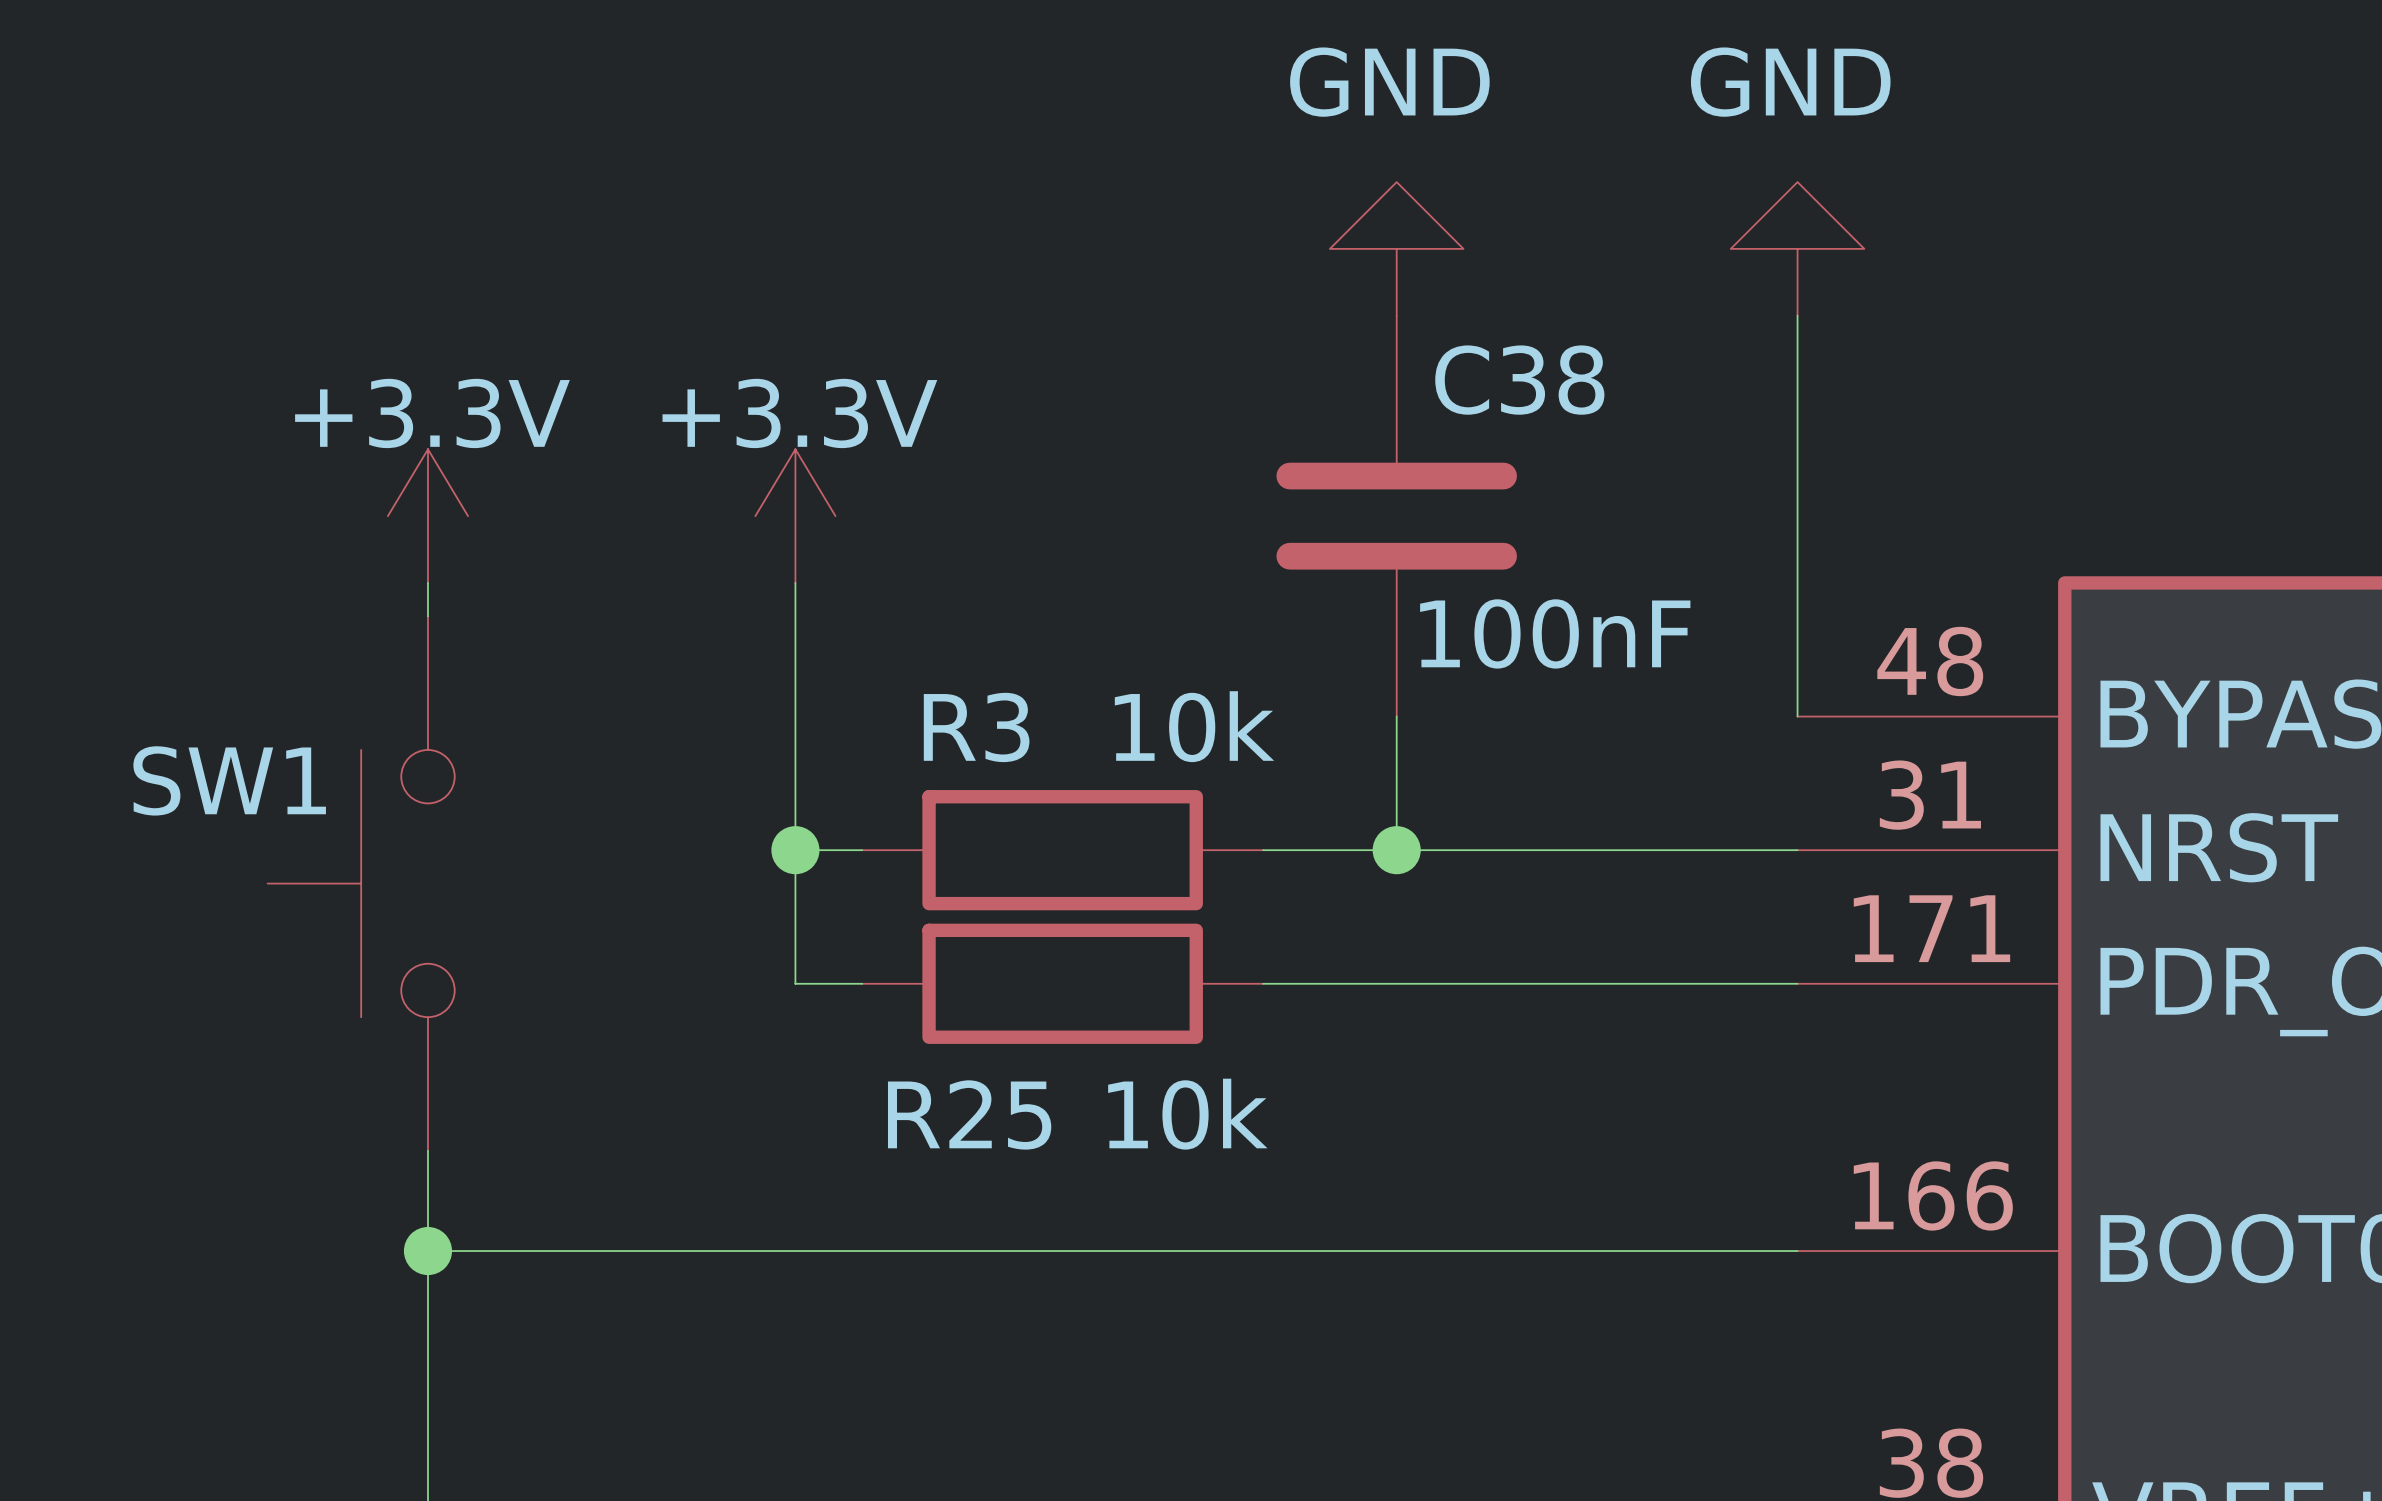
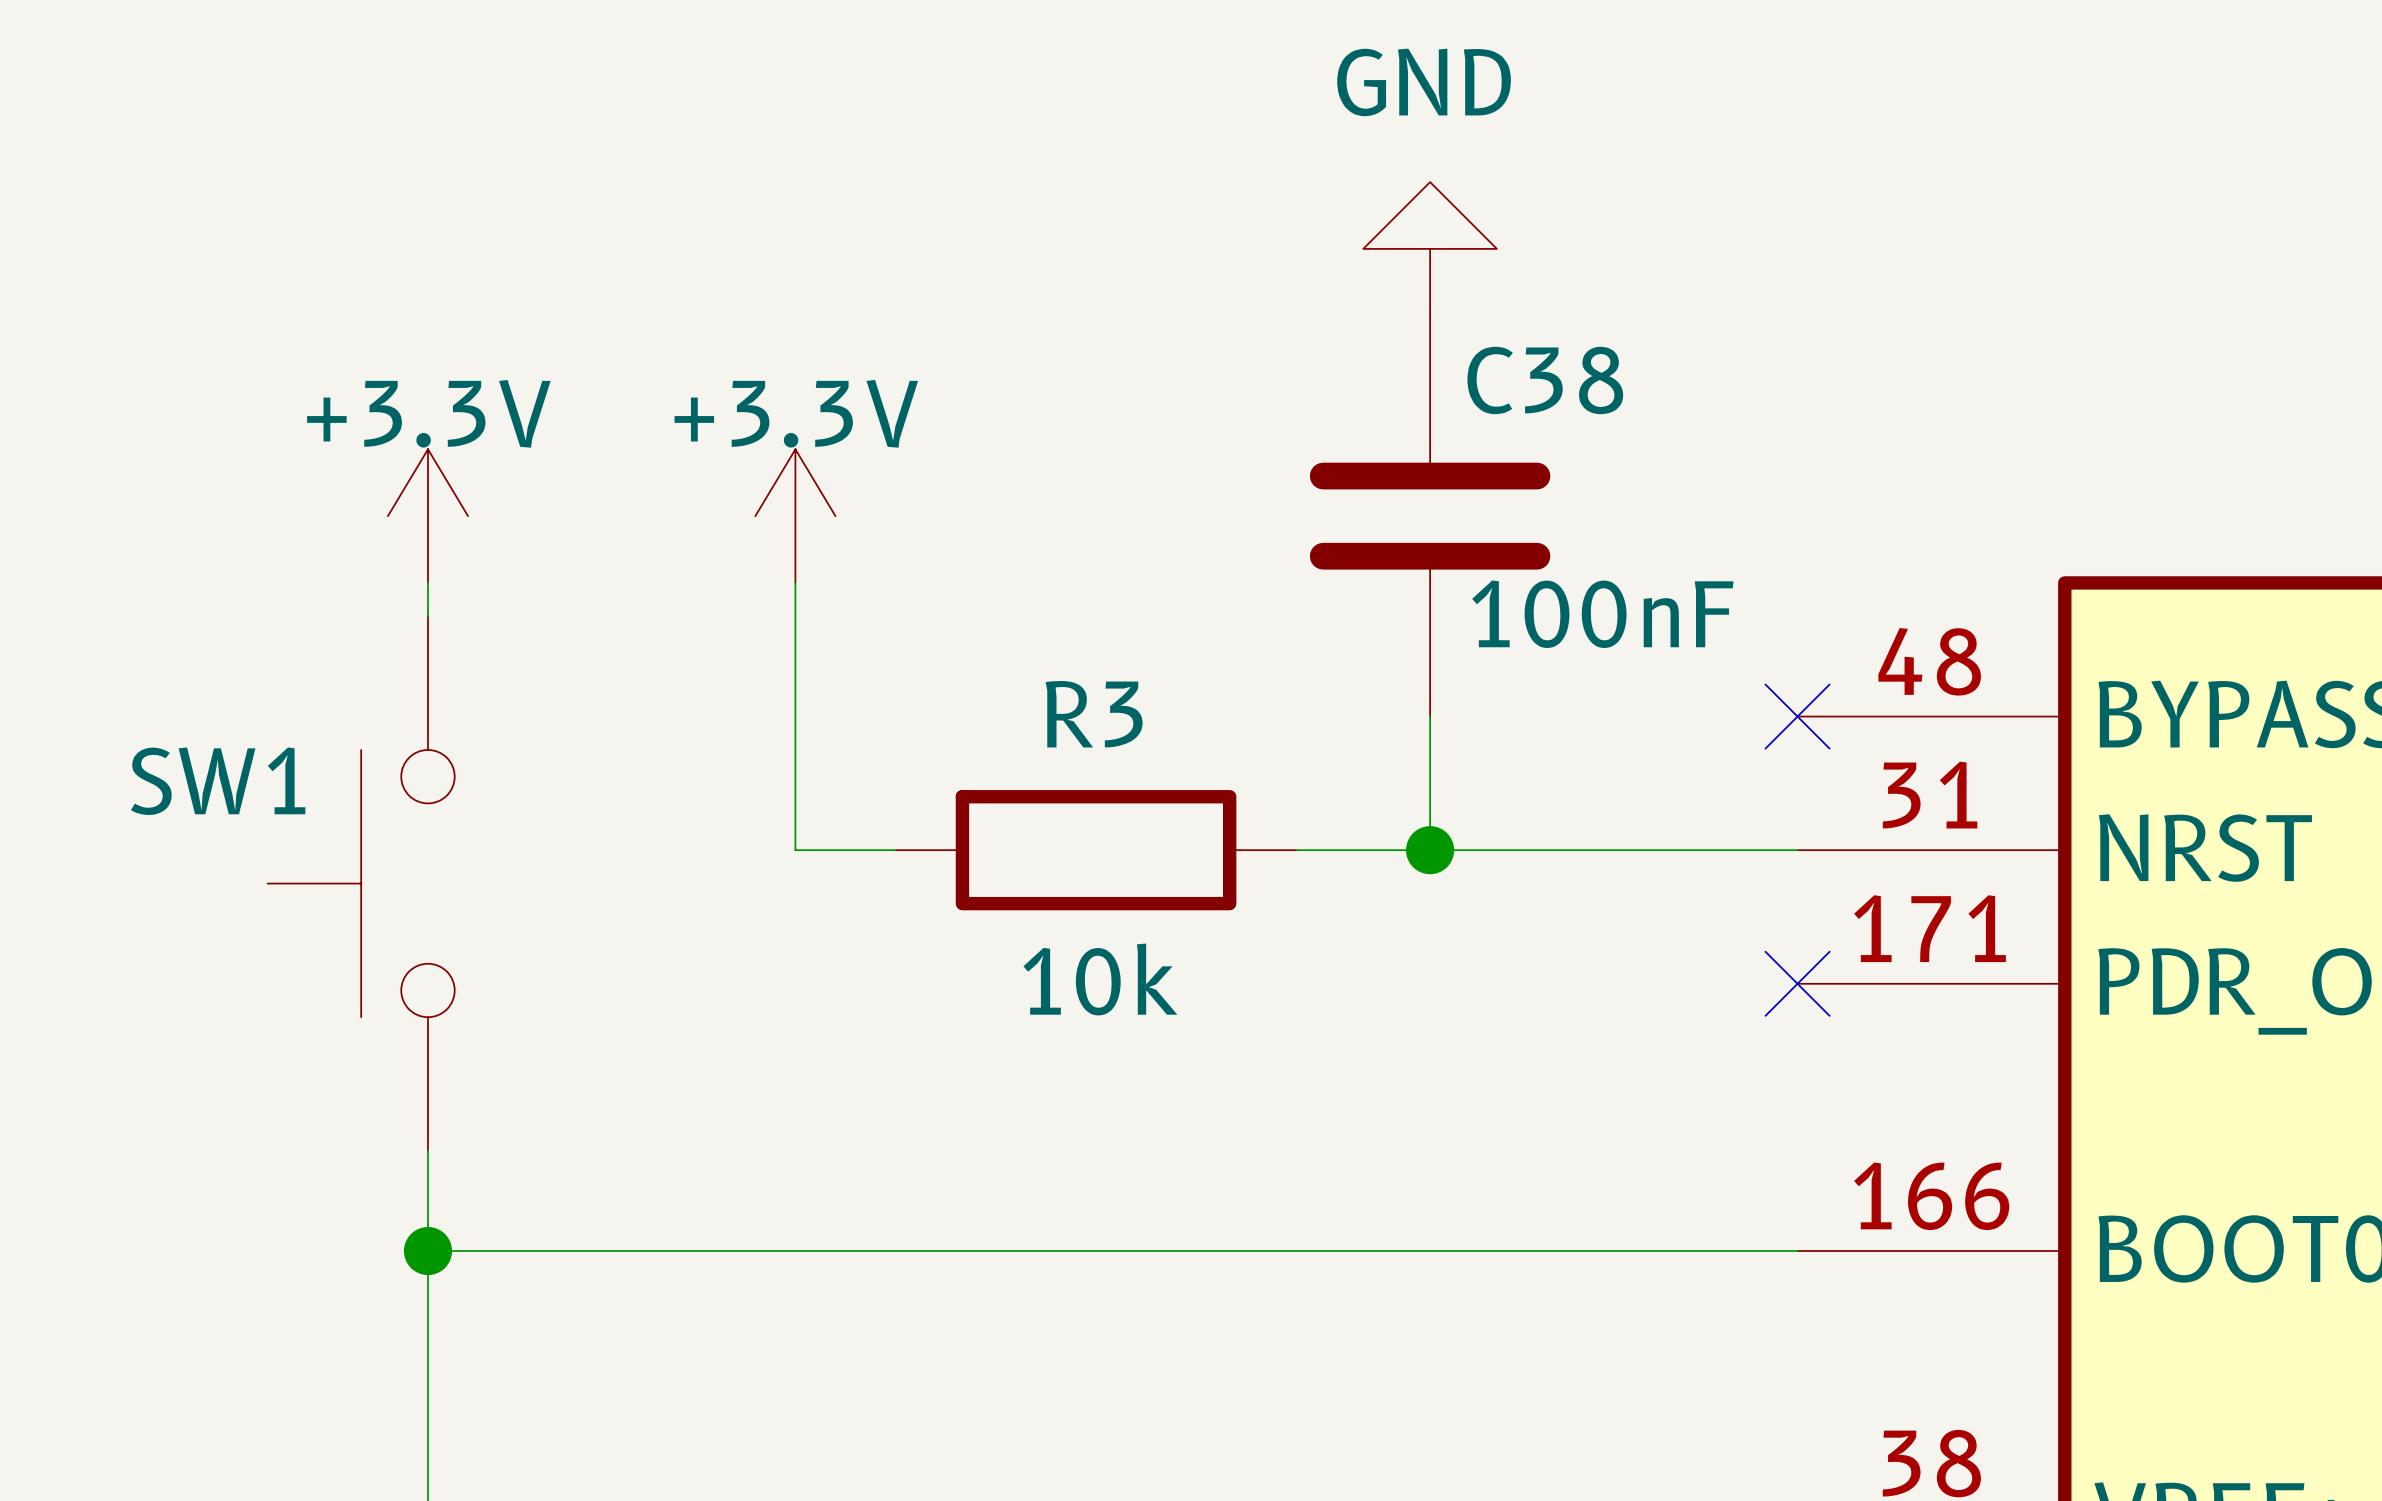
power symbol position: GND (1396, 248) -> GND (1430, 248)
power symbol: GND (1797, 248) -> none
wire: (1797, 315) (1797, 716) -> none
C38 position: (1396, 516) -> (1430, 516)
C38 value position: 100nF (1555, 633) -> 100nF (1602, 614)
wire: (1396, 716) (1396, 850) -> (1430, 716) (1430, 850)
no-connect mark: none -> (1797, 716)
R3 value position: 10k (1194, 726) -> 10k (1100, 979)
R3 name position: R3 (976, 727) -> R3 (1094, 714)
wire: (795, 850) (795, 983) (862, 983) -> none
junction: (795, 850) -> none
R3 position: (1062, 850) -> (1096, 850)
junction position: (1396, 850) -> (1430, 850)
R25: 10k (1062, 983) -> none
wire: (1263, 983) (1797, 983) -> none
no-connect mark: none -> (1797, 983)

